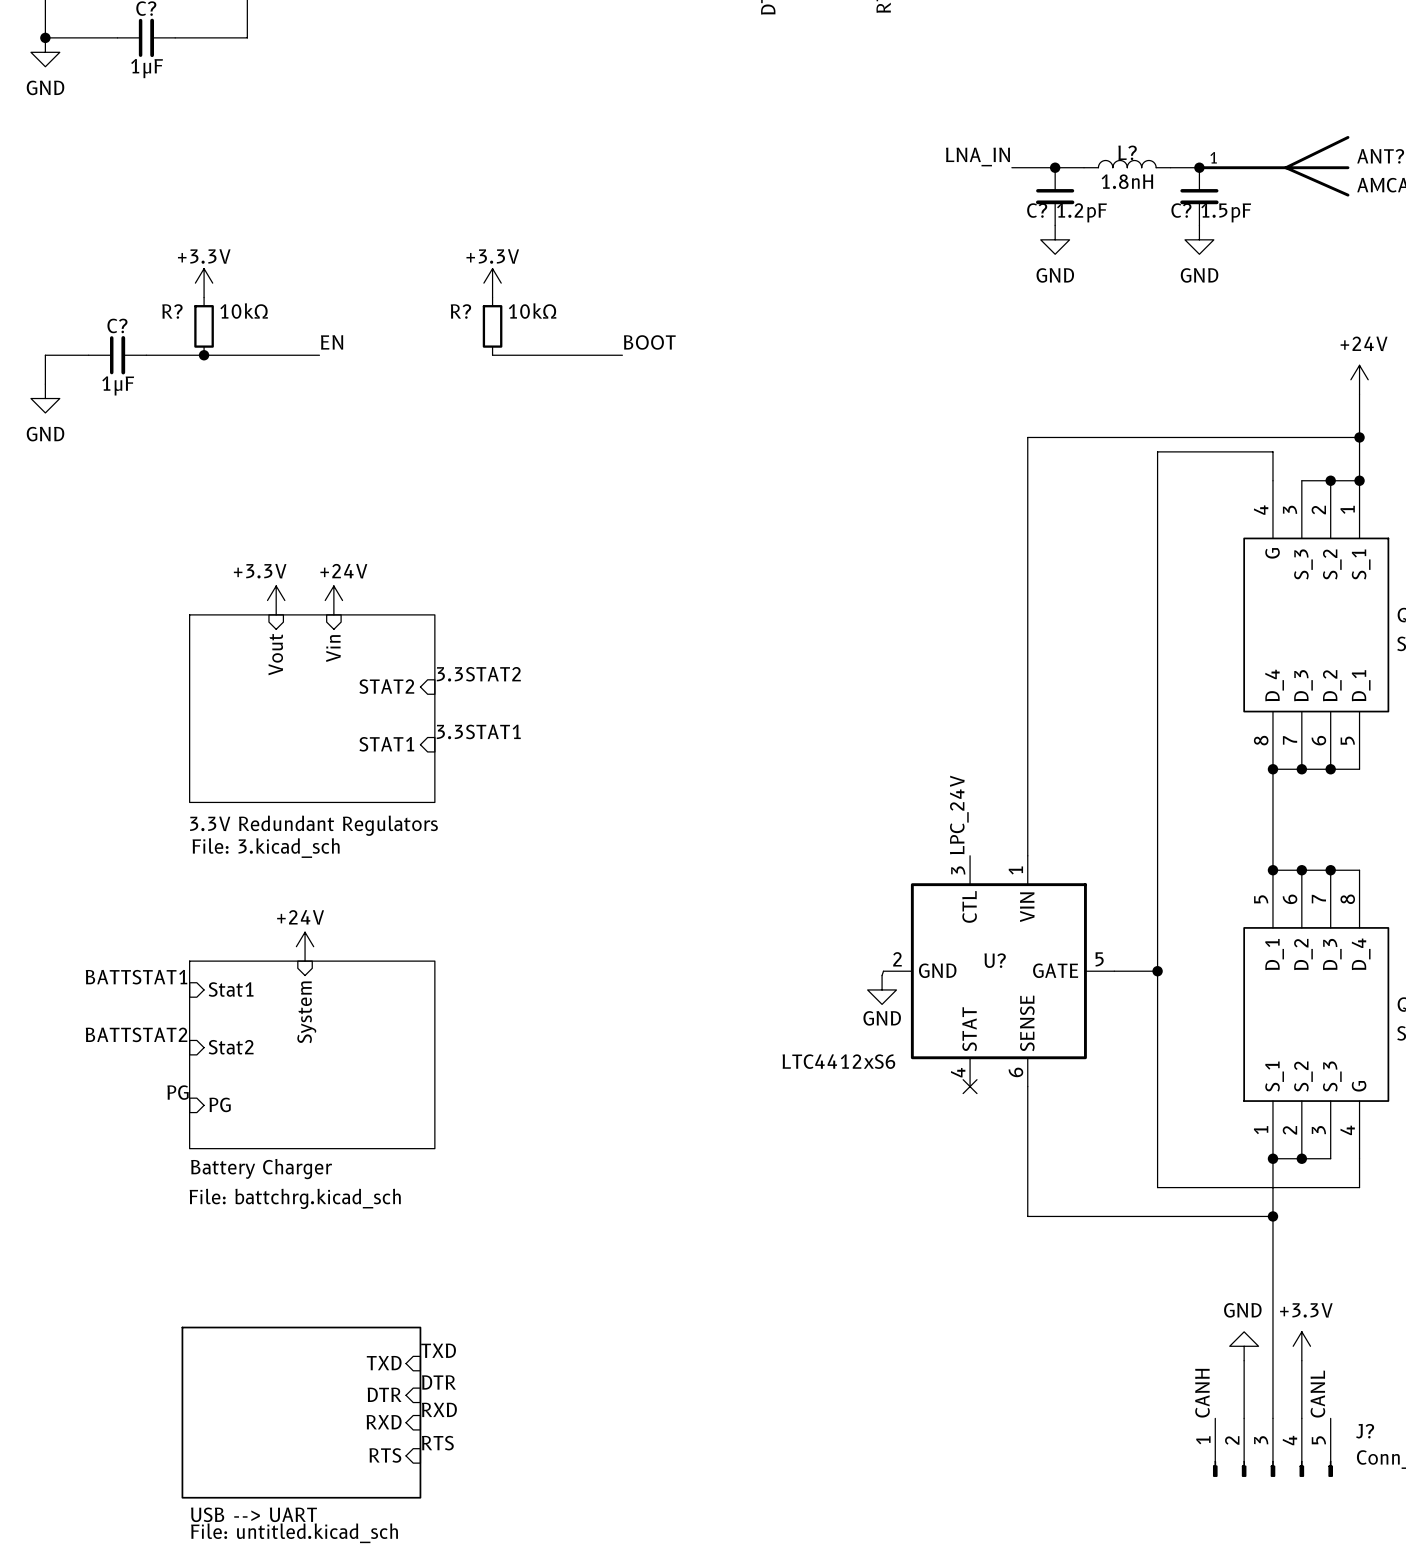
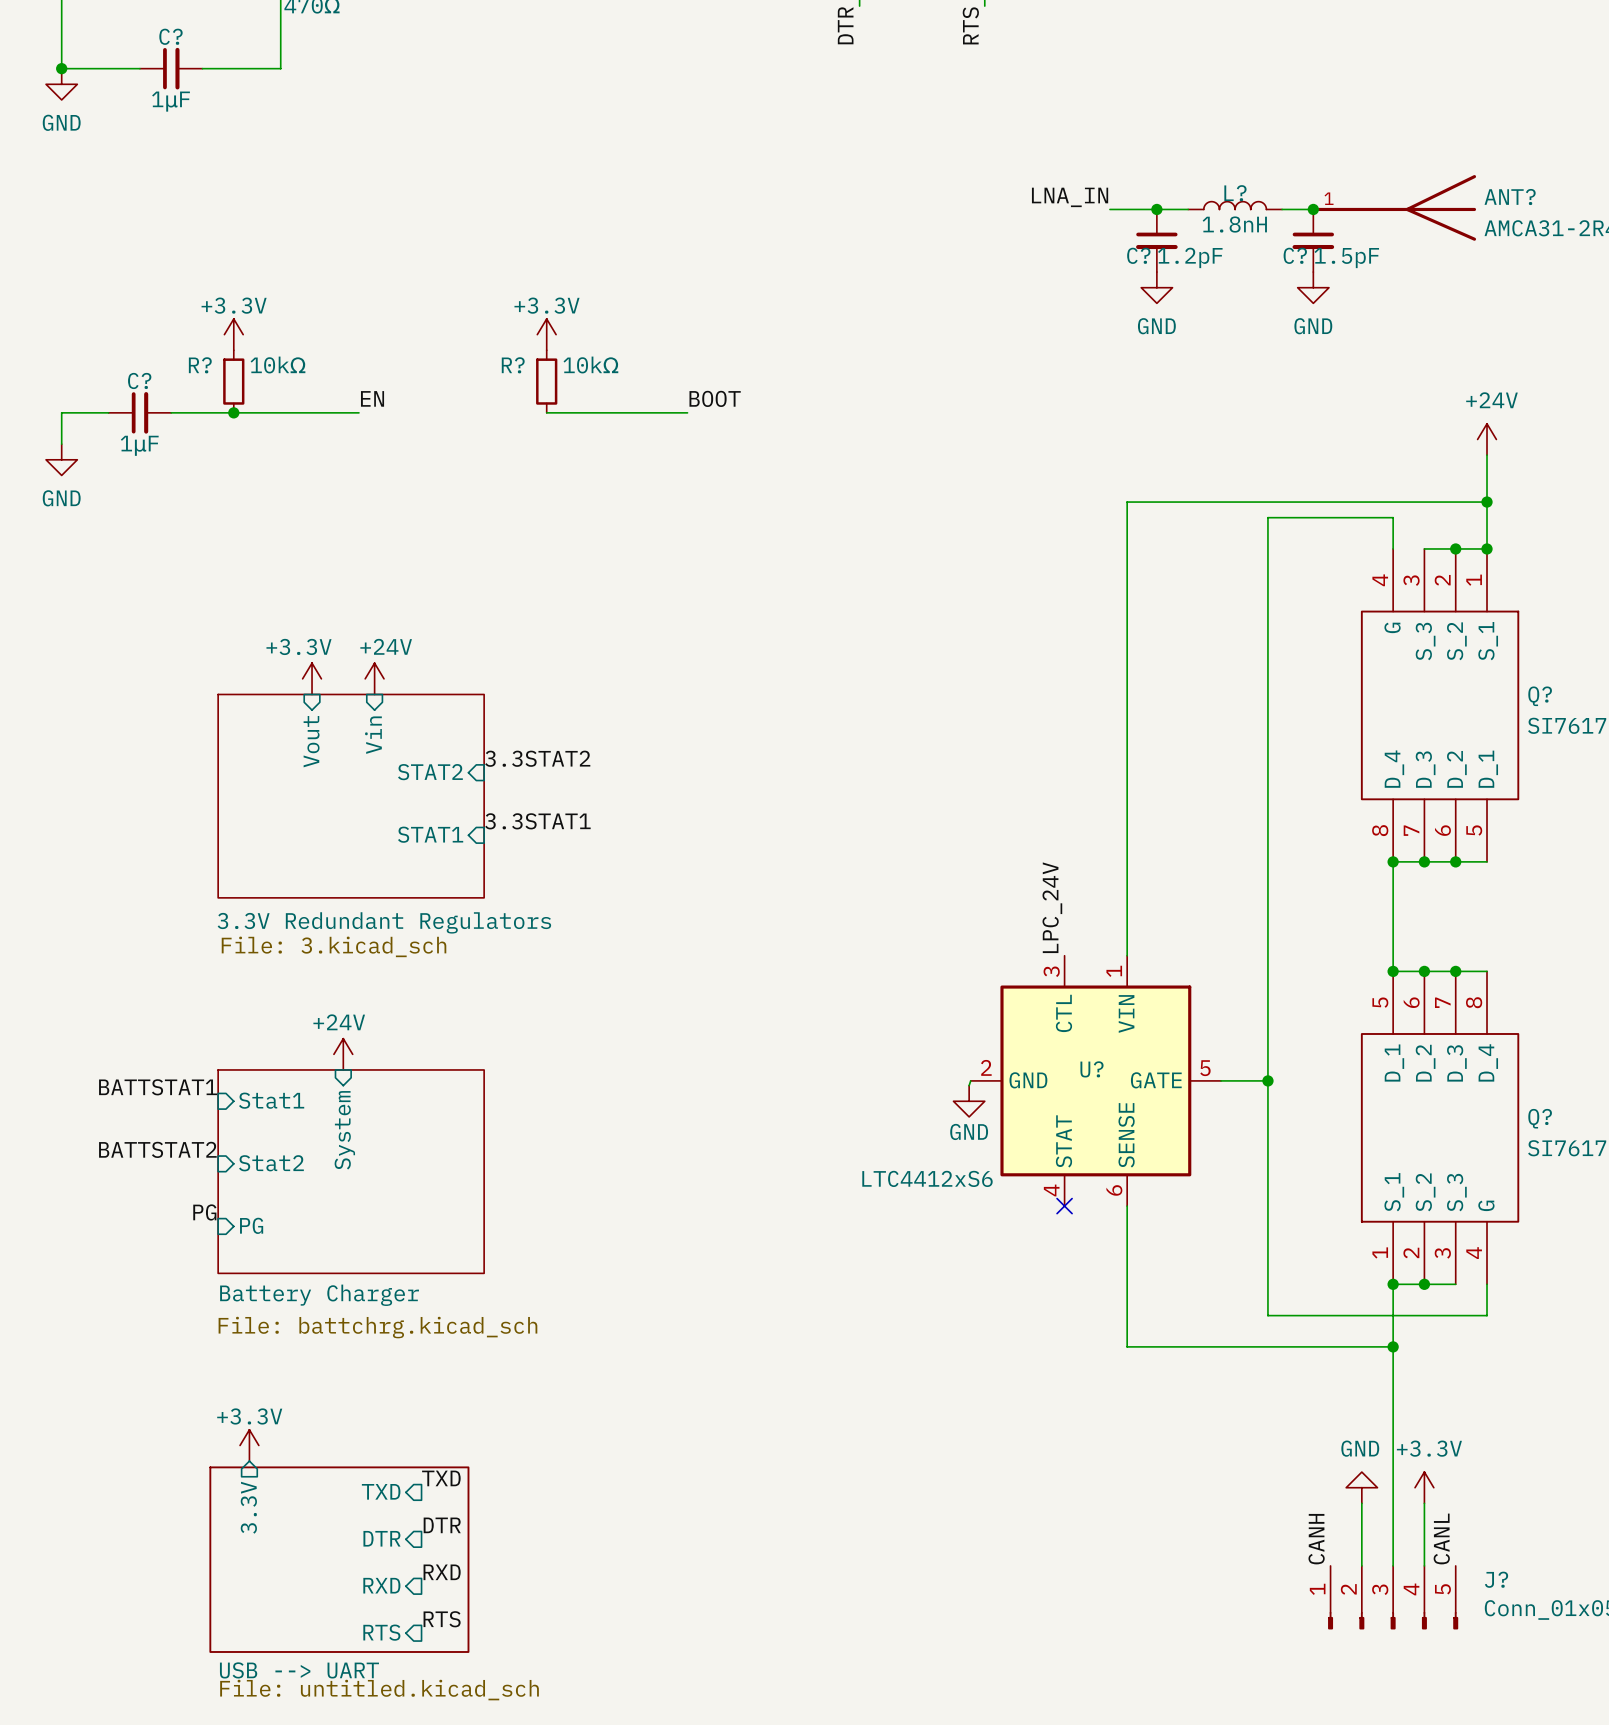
power symbol: none -> +3.3V (249, 1445)
label position: TXD (438, 1350) -> TXD (441, 1478)
sheet pin: none -> 3.3V (248, 1507)
sheet pin position: TXD (384, 1363) -> TXD (381, 1491)
label position: DTR (438, 1382) -> DTR (442, 1525)
sheet pin position: DTR (384, 1394) -> DTR (381, 1538)
label position: RXD (439, 1409) -> RXD (442, 1572)
sheet pin position: RXD (384, 1422) -> RXD (381, 1585)
label position: RTS (437, 1443) -> RTS (442, 1619)
sheet pin position: RTS (385, 1455) -> RTS (381, 1632)

